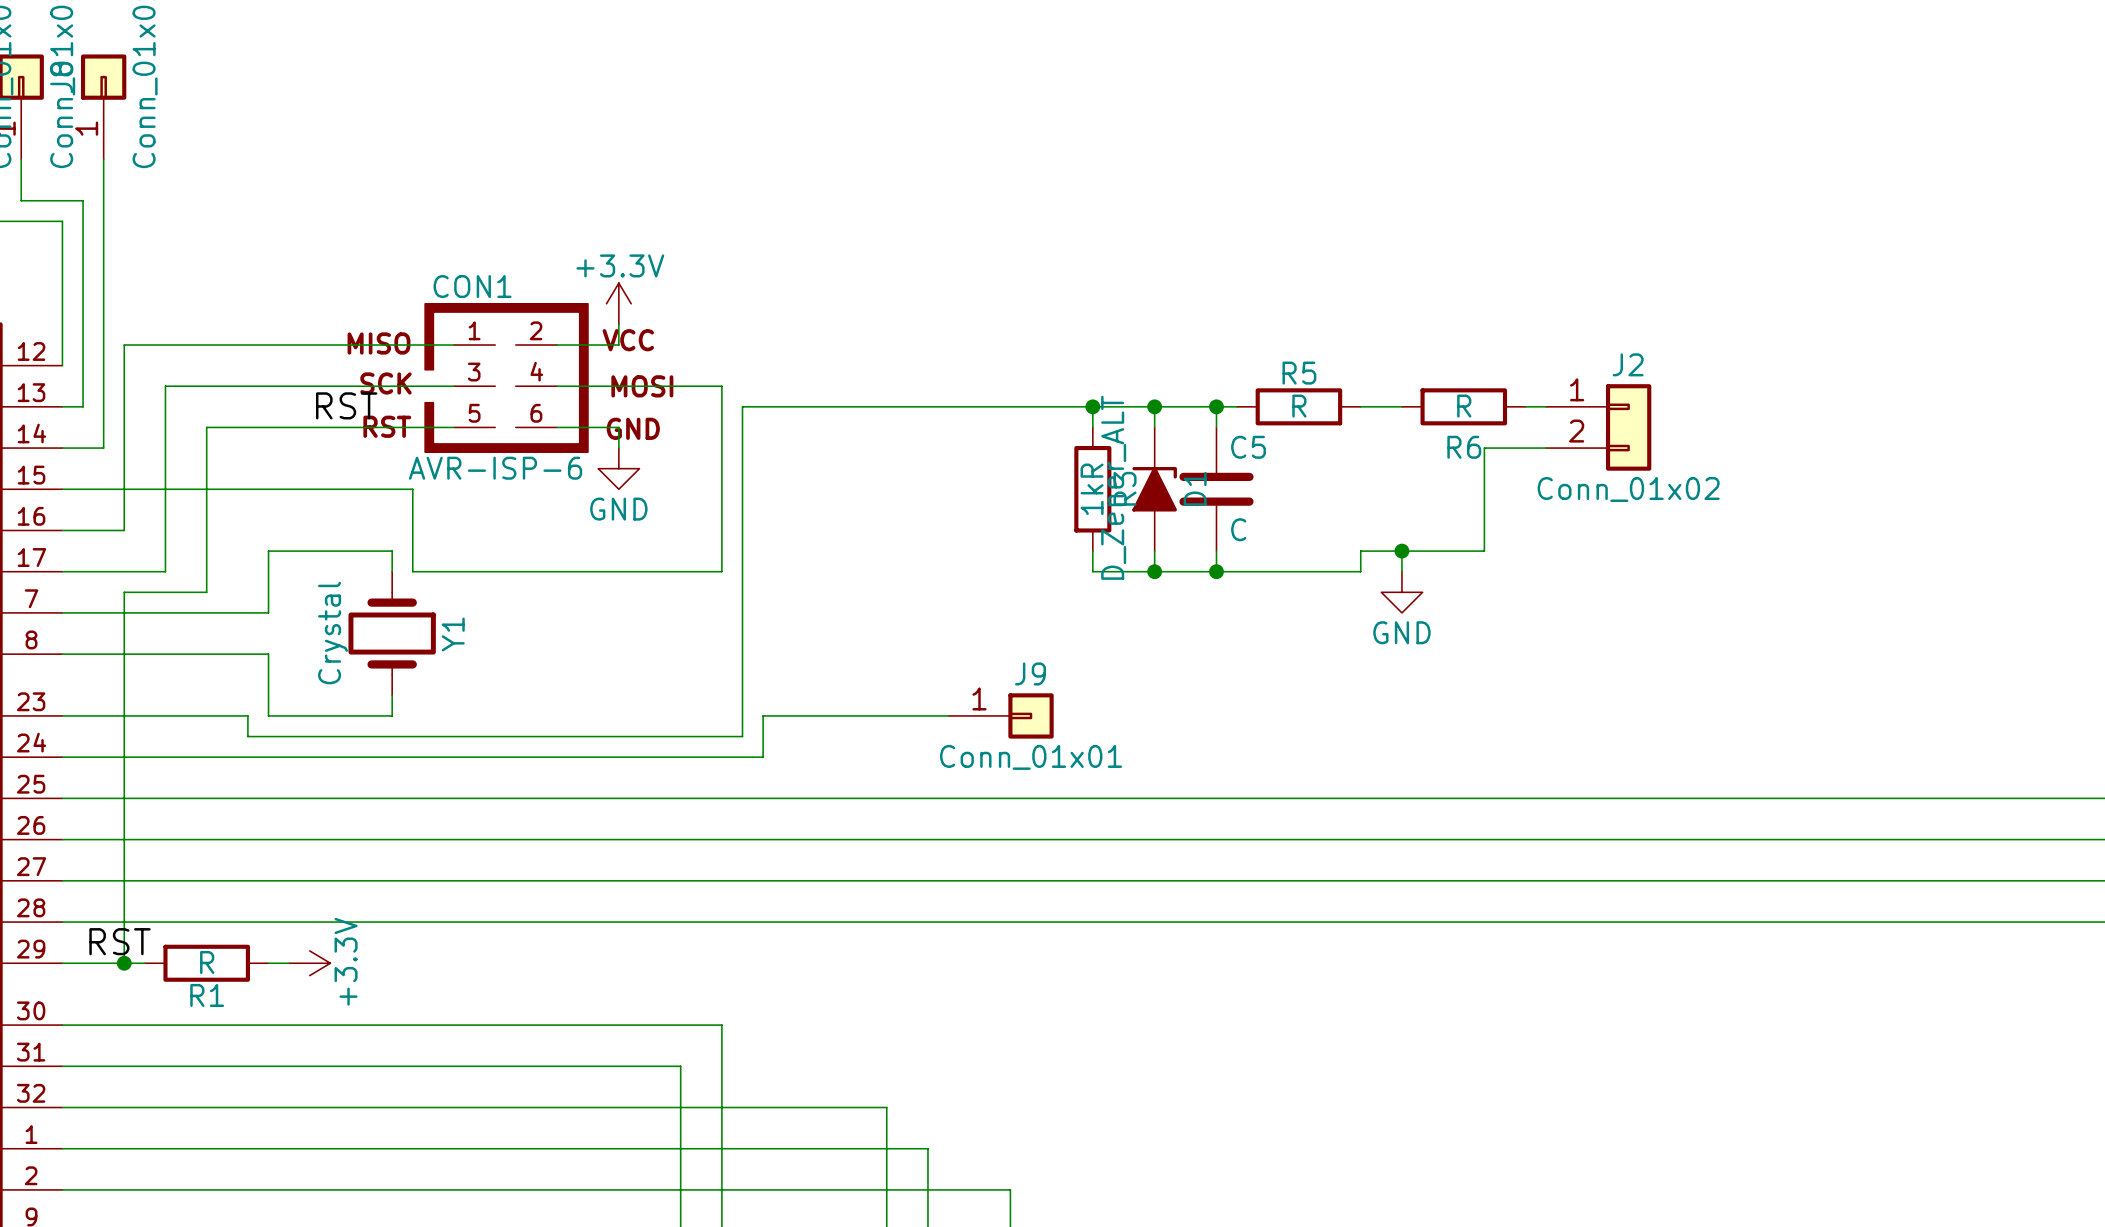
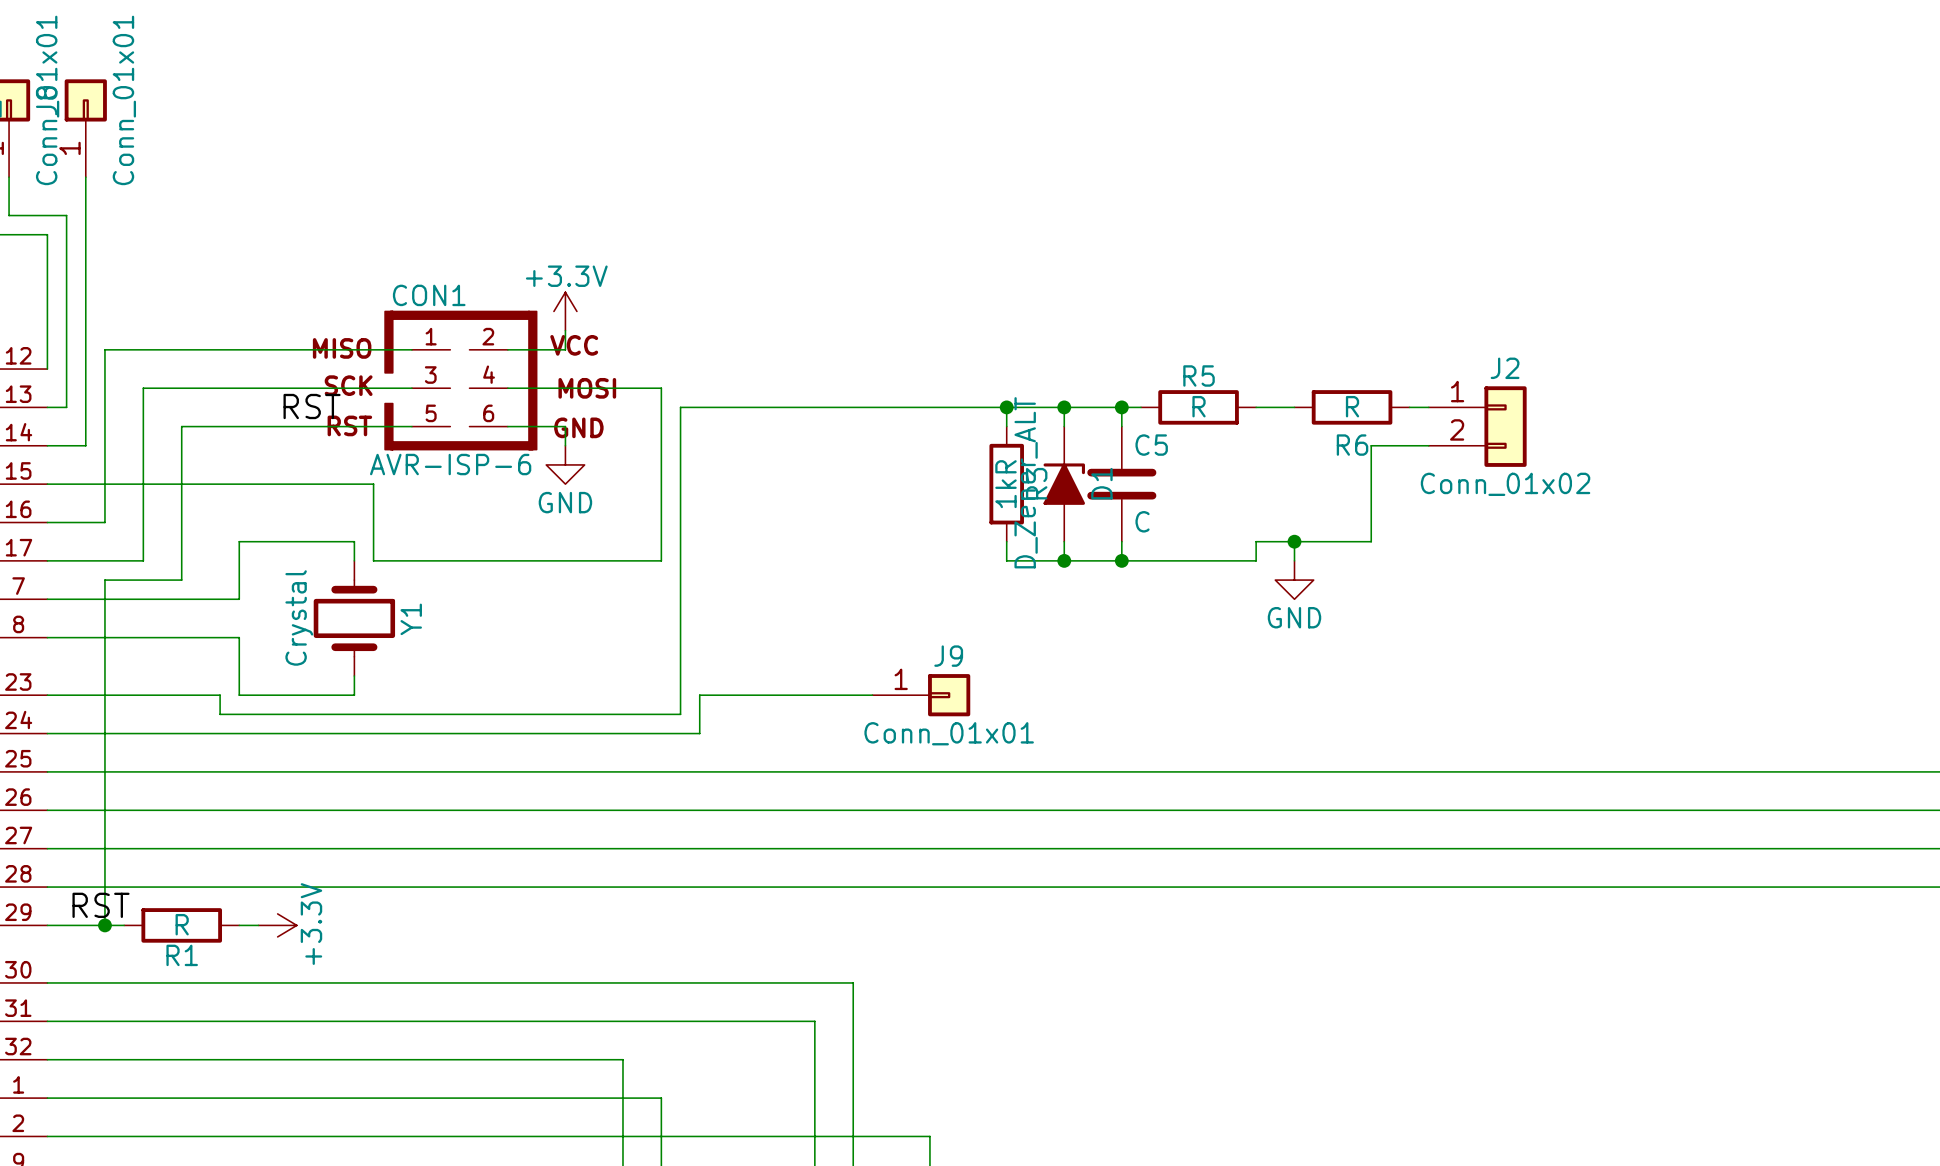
wire: (721, 1025) (721, 1148) (927, 1148) -> (661, 982) (853, 982) (853, 1098)
wire: (680, 1066) (680, 1107) (886, 1107) -> (622, 1021) (814, 1021) (814, 1059)

